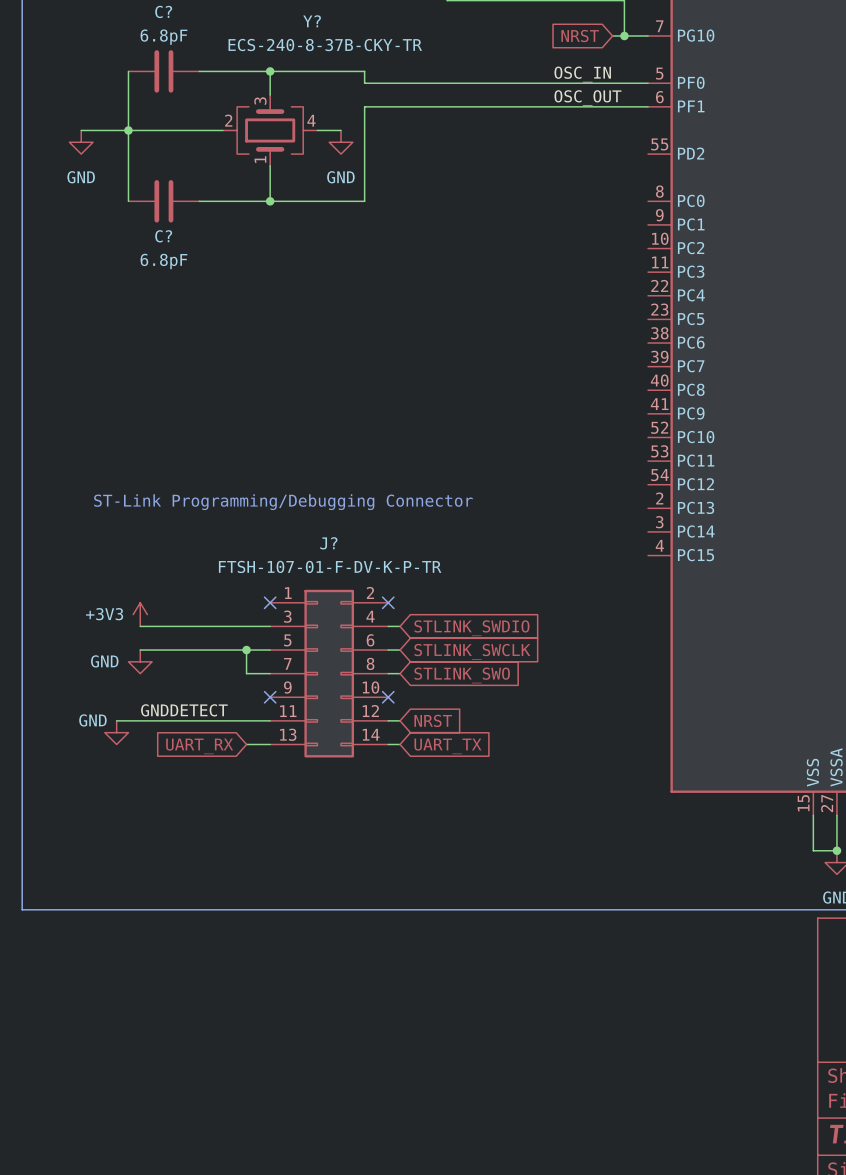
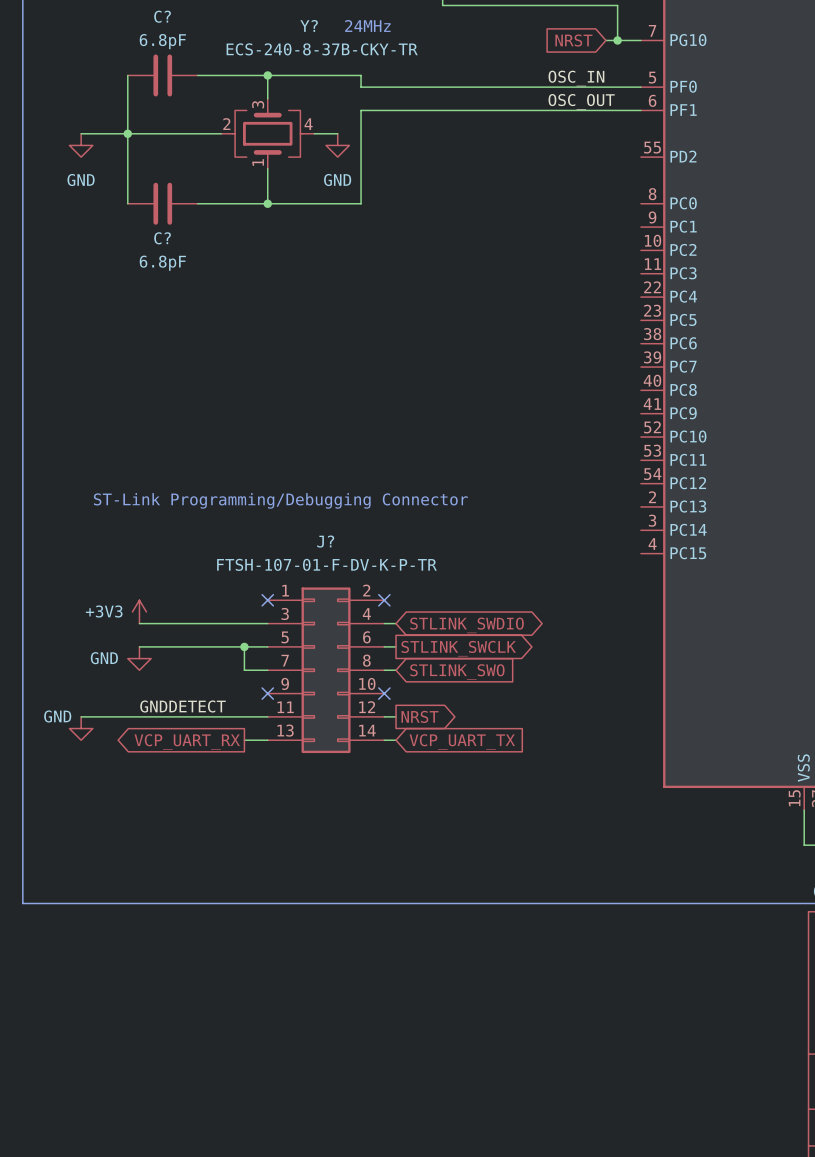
text: none -> 24MHz (367, 25)
global label shape: input (471, 628) -> bidirectional (467, 625)
global label shape: input (472, 651) -> output (458, 648)
wire: none -> (81, 716) (116, 716)
global label shape: input (433, 720) -> output (420, 716)
power symbol position: GND (116, 732) -> GND (81, 728)
global label shape: input (199, 746) -> output (187, 742)
global label: UART_RX (199, 746) -> VCP_UART_RX (187, 742)
global label: UART_TX (447, 746) -> VCP_UART_TX (462, 742)

